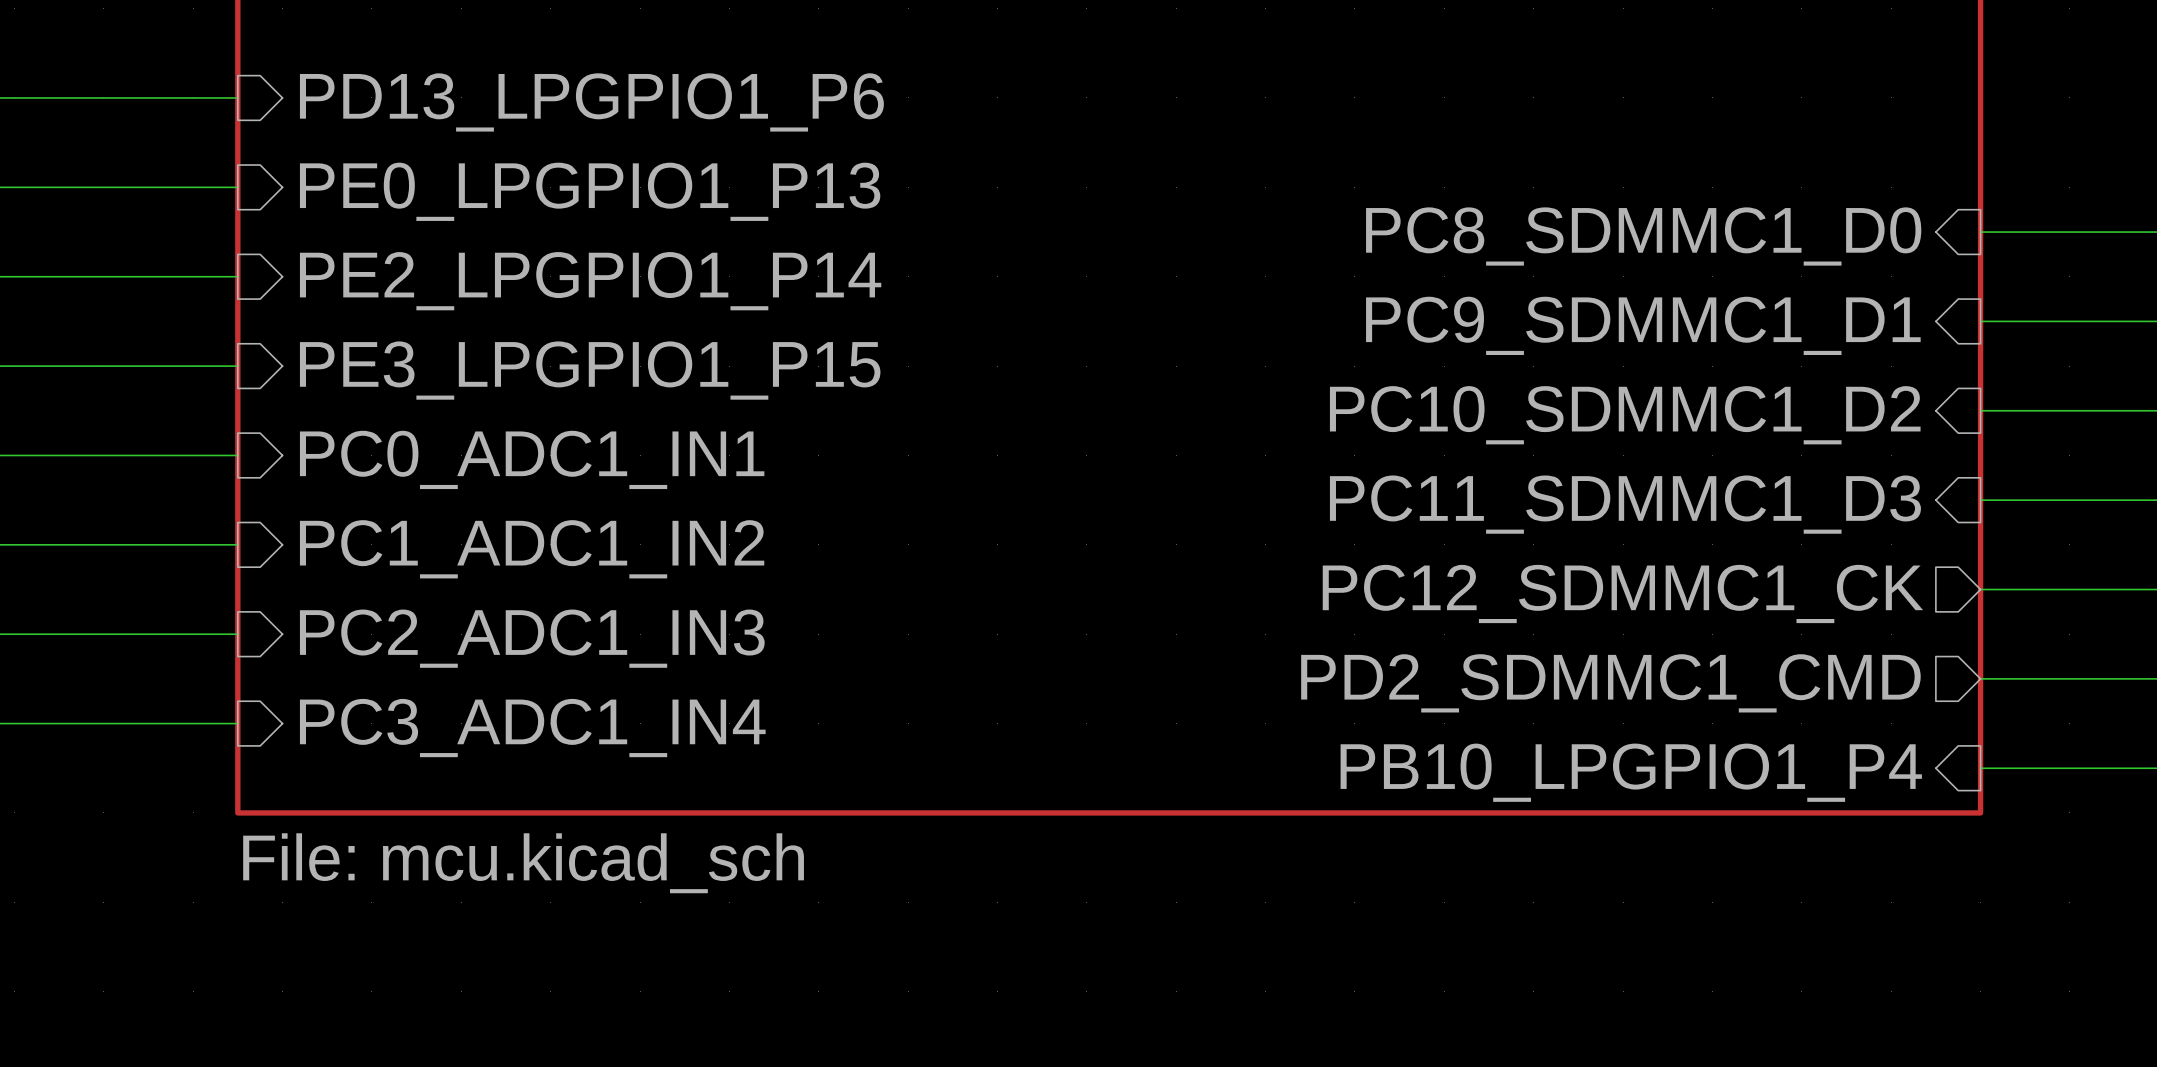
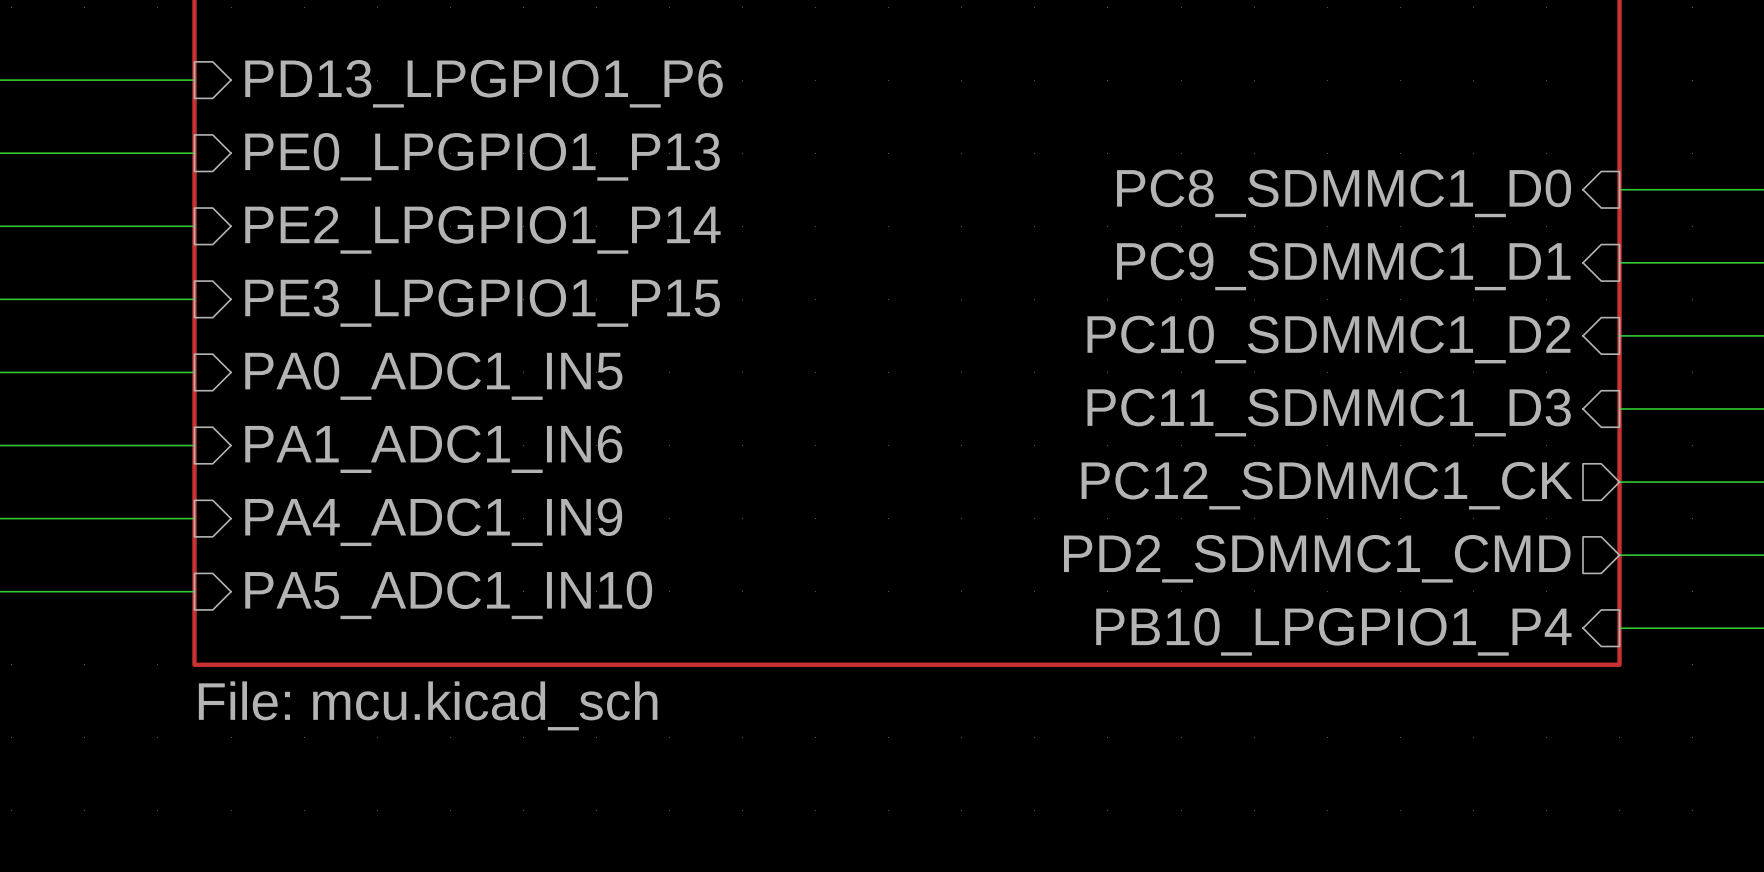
sheet pin: PC0_ADC1_IN1 (532, 459) -> PA0_ADC1_IN5 (433, 376)
sheet pin: PC1_ADC1_IN2 (532, 549) -> PA1_ADC1_IN6 (433, 449)
sheet pin: PC2_ADC1_IN3 (532, 638) -> PA4_ADC1_IN9 (433, 522)
sheet pin: PC3_ADC1_IN4 (532, 728) -> PA5_ADC1_IN10 (448, 595)

